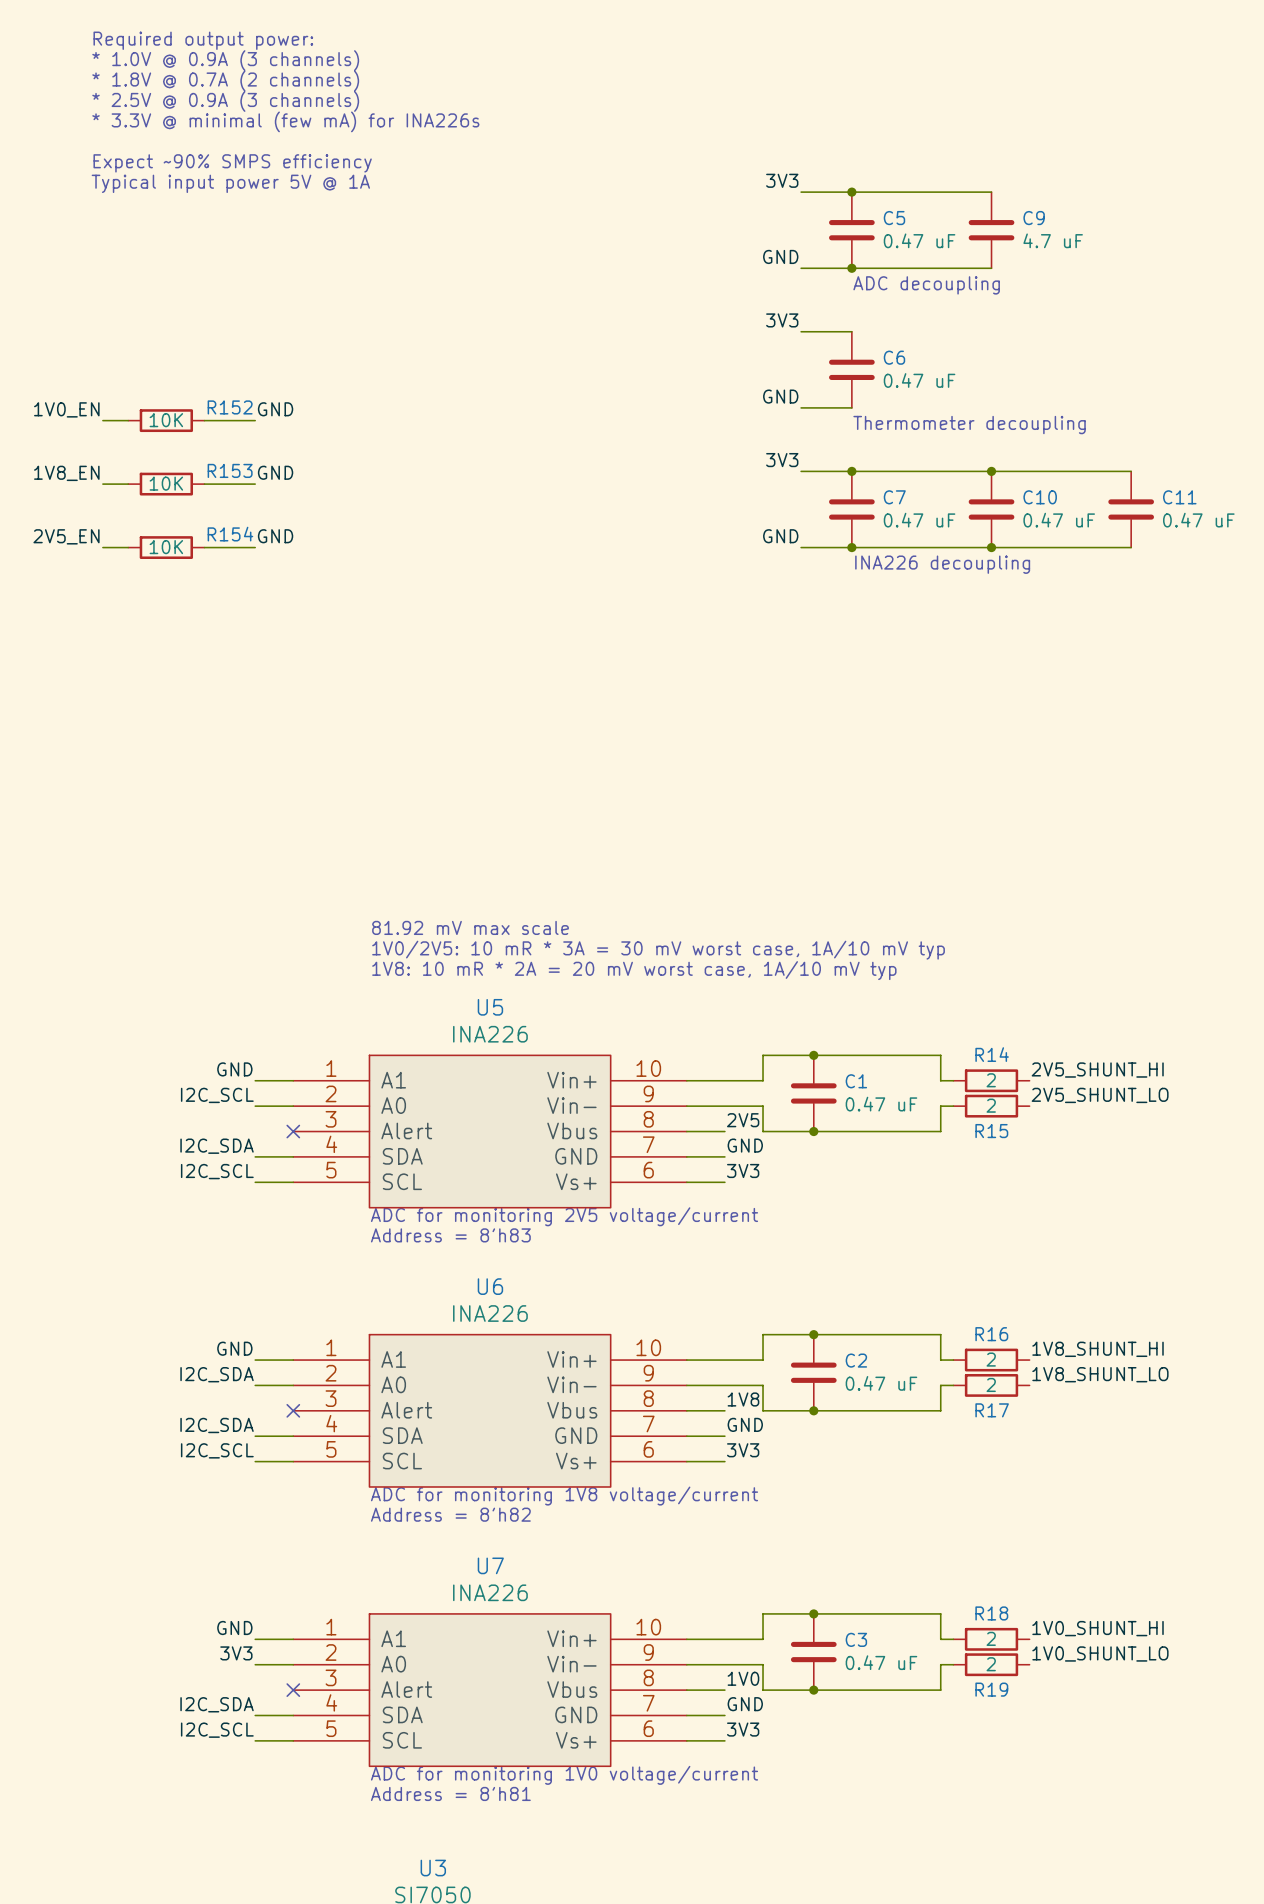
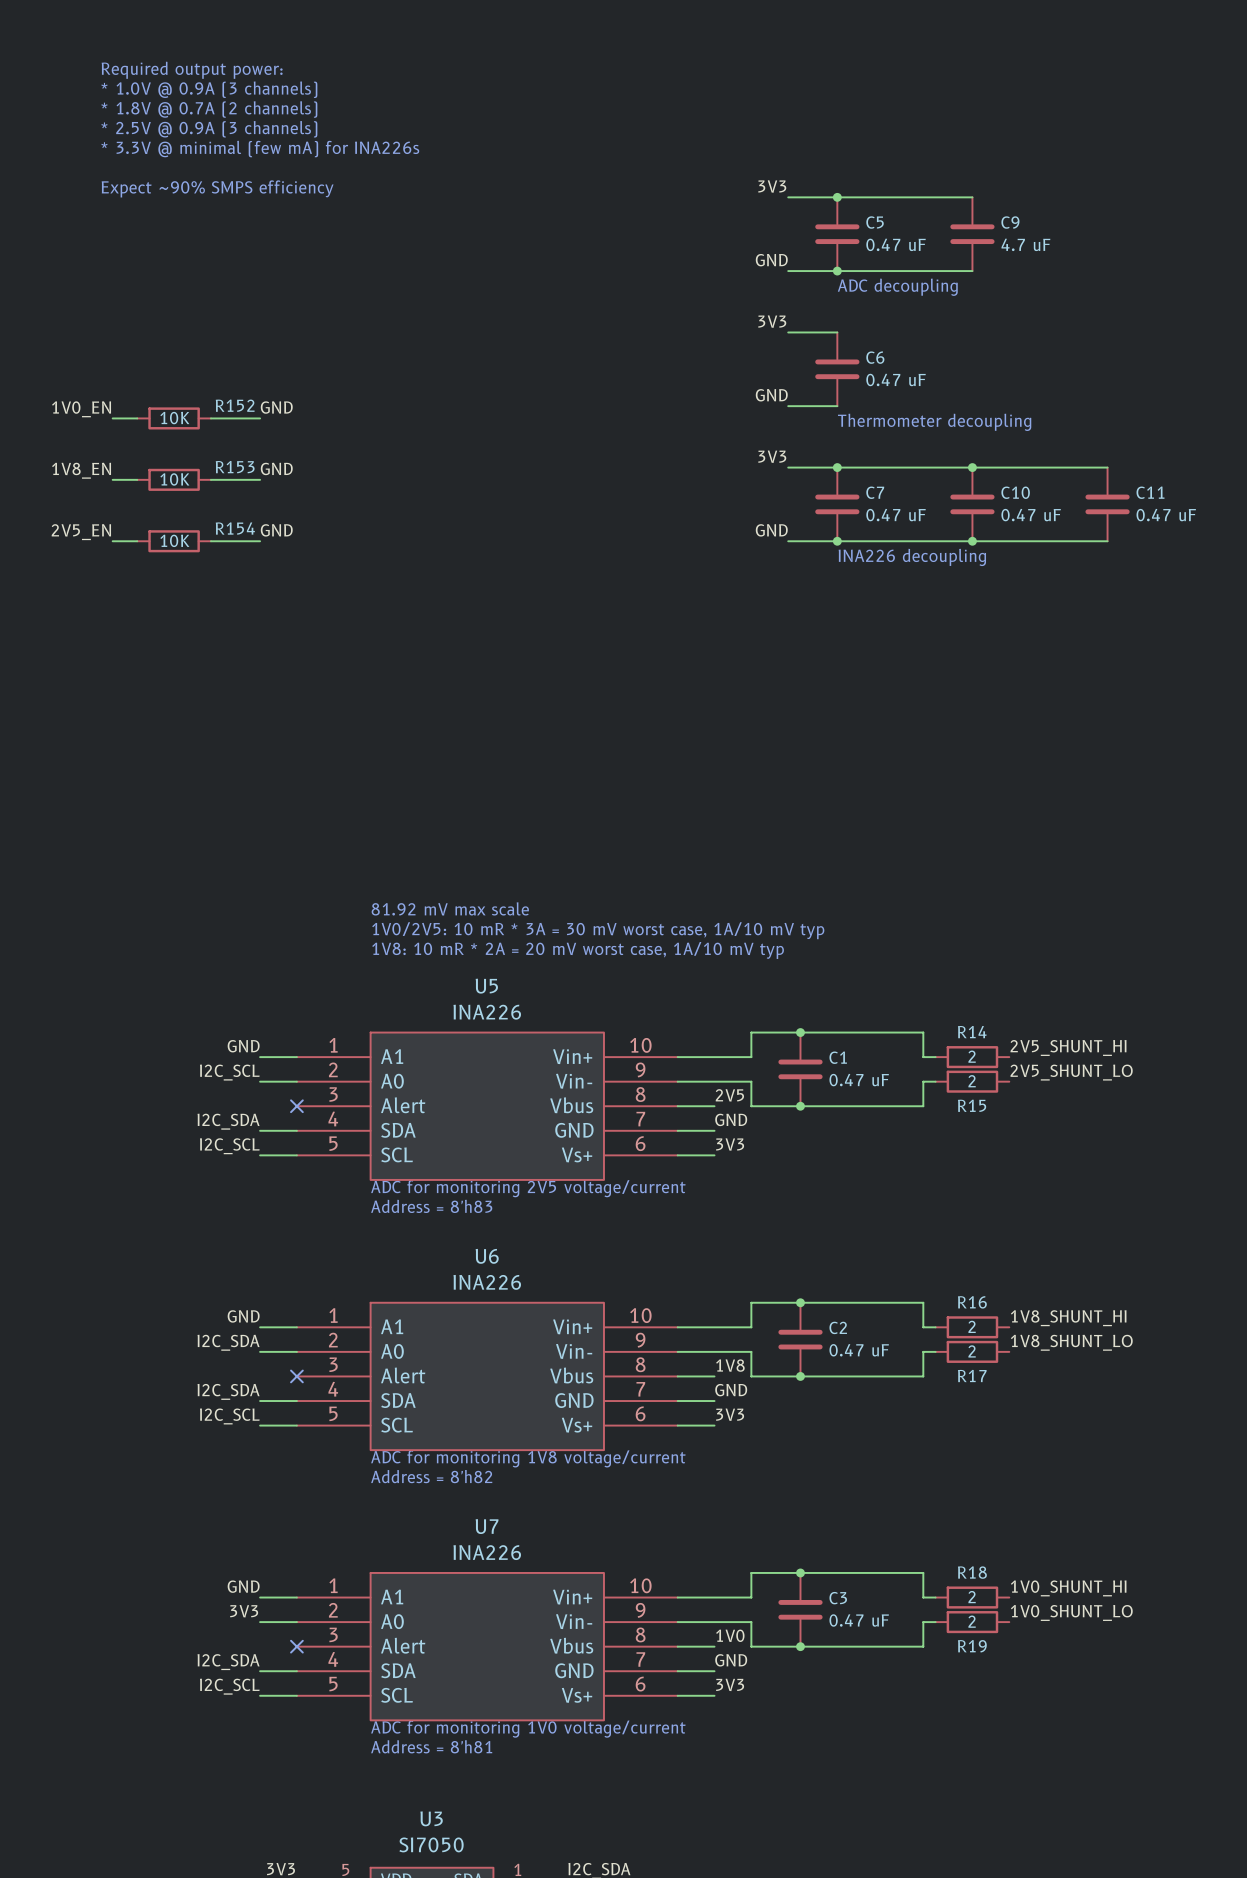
text: Required output power: (203, 40) -> none
text: * 1.0V @ 0.9A (3 channels) (225, 60) -> Required output power: (192, 70)
text: * 1.8V @ 0.7A (2 channels) (225, 81) -> * 1.0V @ 0.9A (3 channels) (209, 89)
text: * 2.5V @ 0.9A (3 channels) (225, 101) -> * 1.8V @ 0.7A (2 channels) (209, 109)
text: * 3.3V @ minimal (few mA) for INA226s (285, 121) -> * 2.5V @ 0.9A (3 channels) (209, 129)
text: none -> * 3.3V @ minimal (few mA) for INA226s (260, 149)
text: Expect ~90% SMPS efficiency (232, 163) -> none
text: Typical input power 5V @ 1A (230, 183) -> Expect ~90% SMPS efficiency (217, 188)

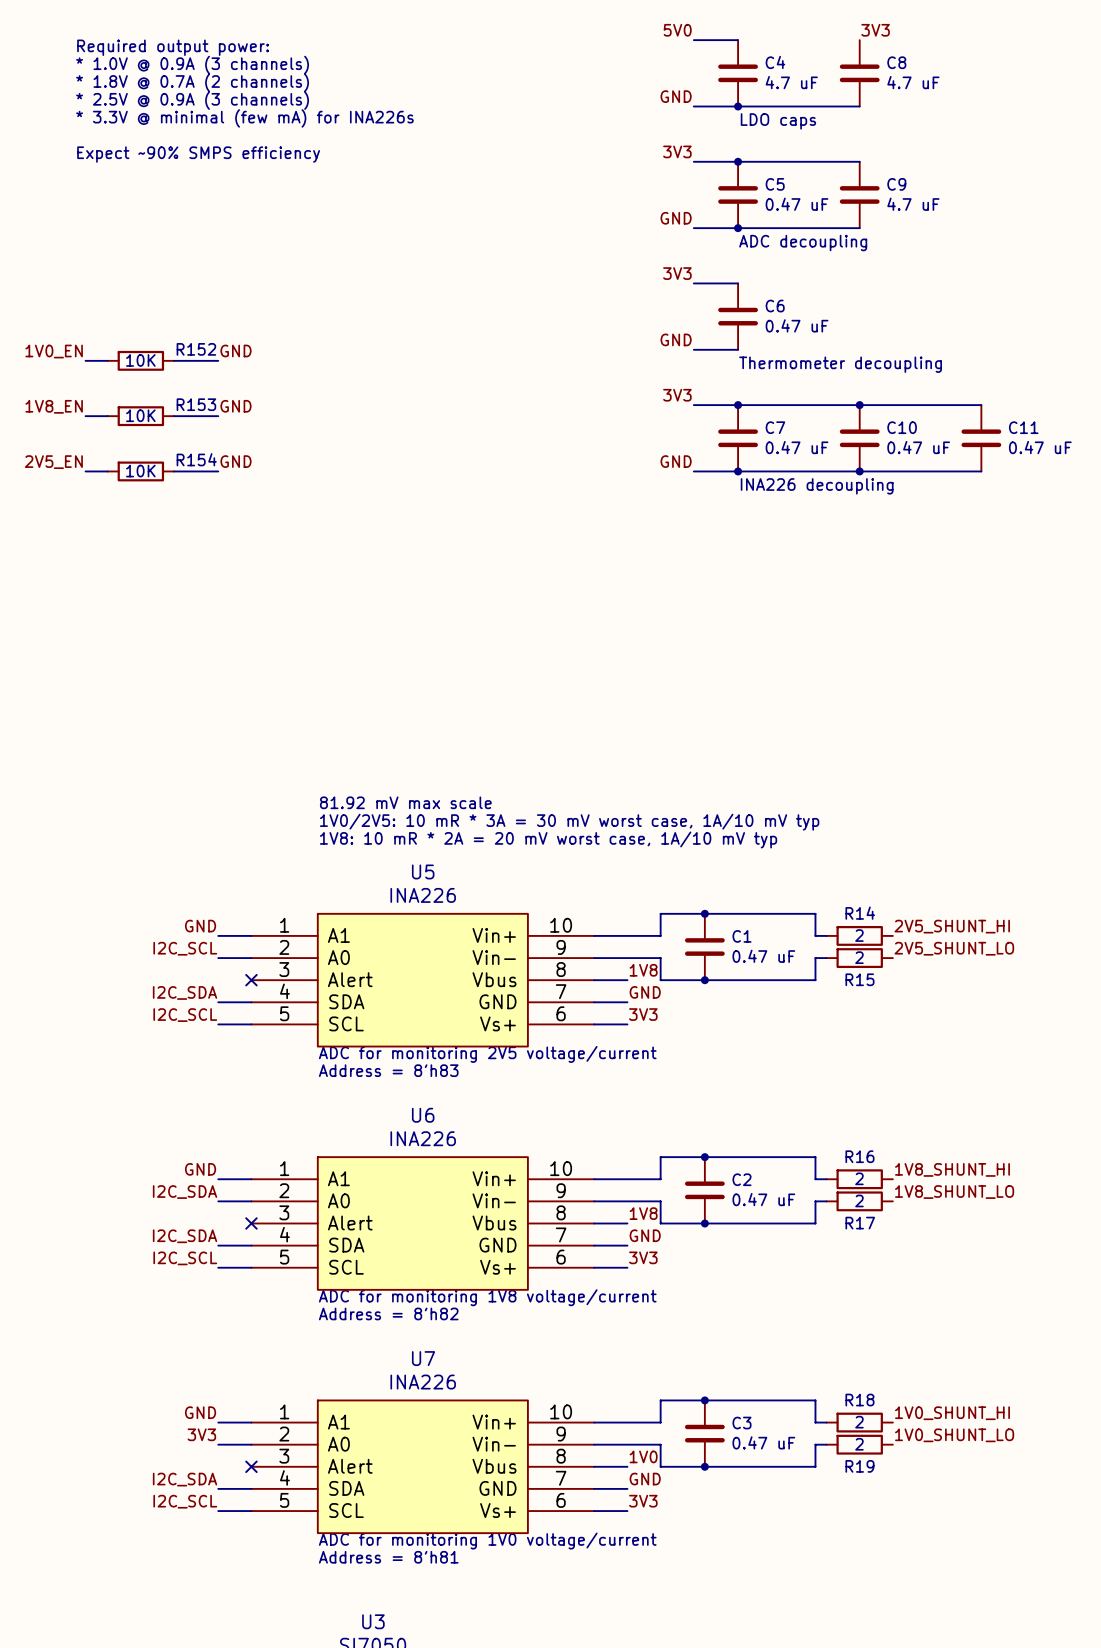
label: none -> 5V0 (677, 30)
label: none -> 3V3 (875, 30)
wire: none -> (693, 40) (738, 40)
C4: none -> 4.7 uF (738, 73)
C8: none -> 4.7 uF (859, 73)
label: none -> GND (676, 96)
wire: none -> (693, 106) (859, 106)
junction: none -> (738, 106)
text: none -> LDO caps (778, 121)
label: 2V5 (729, 1095) -> 1V8 (643, 970)

